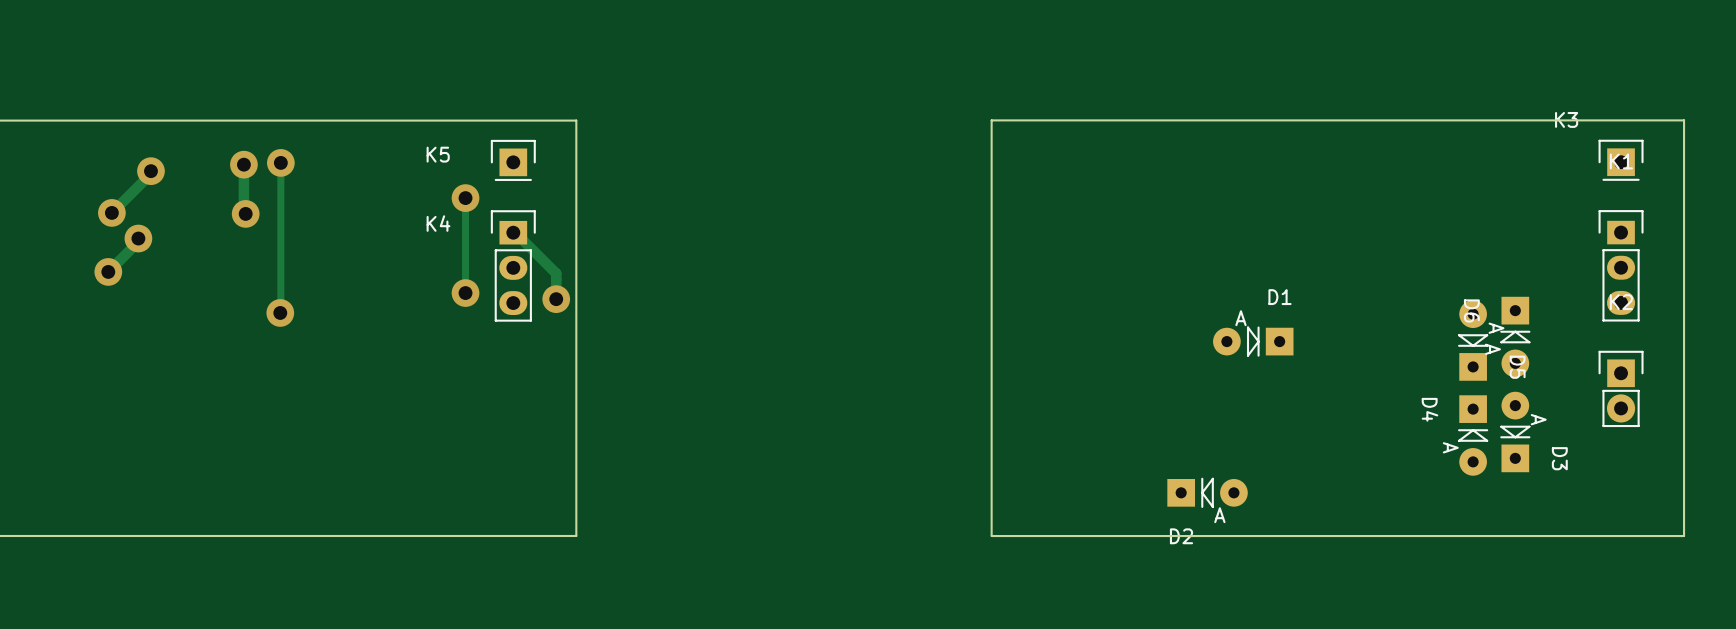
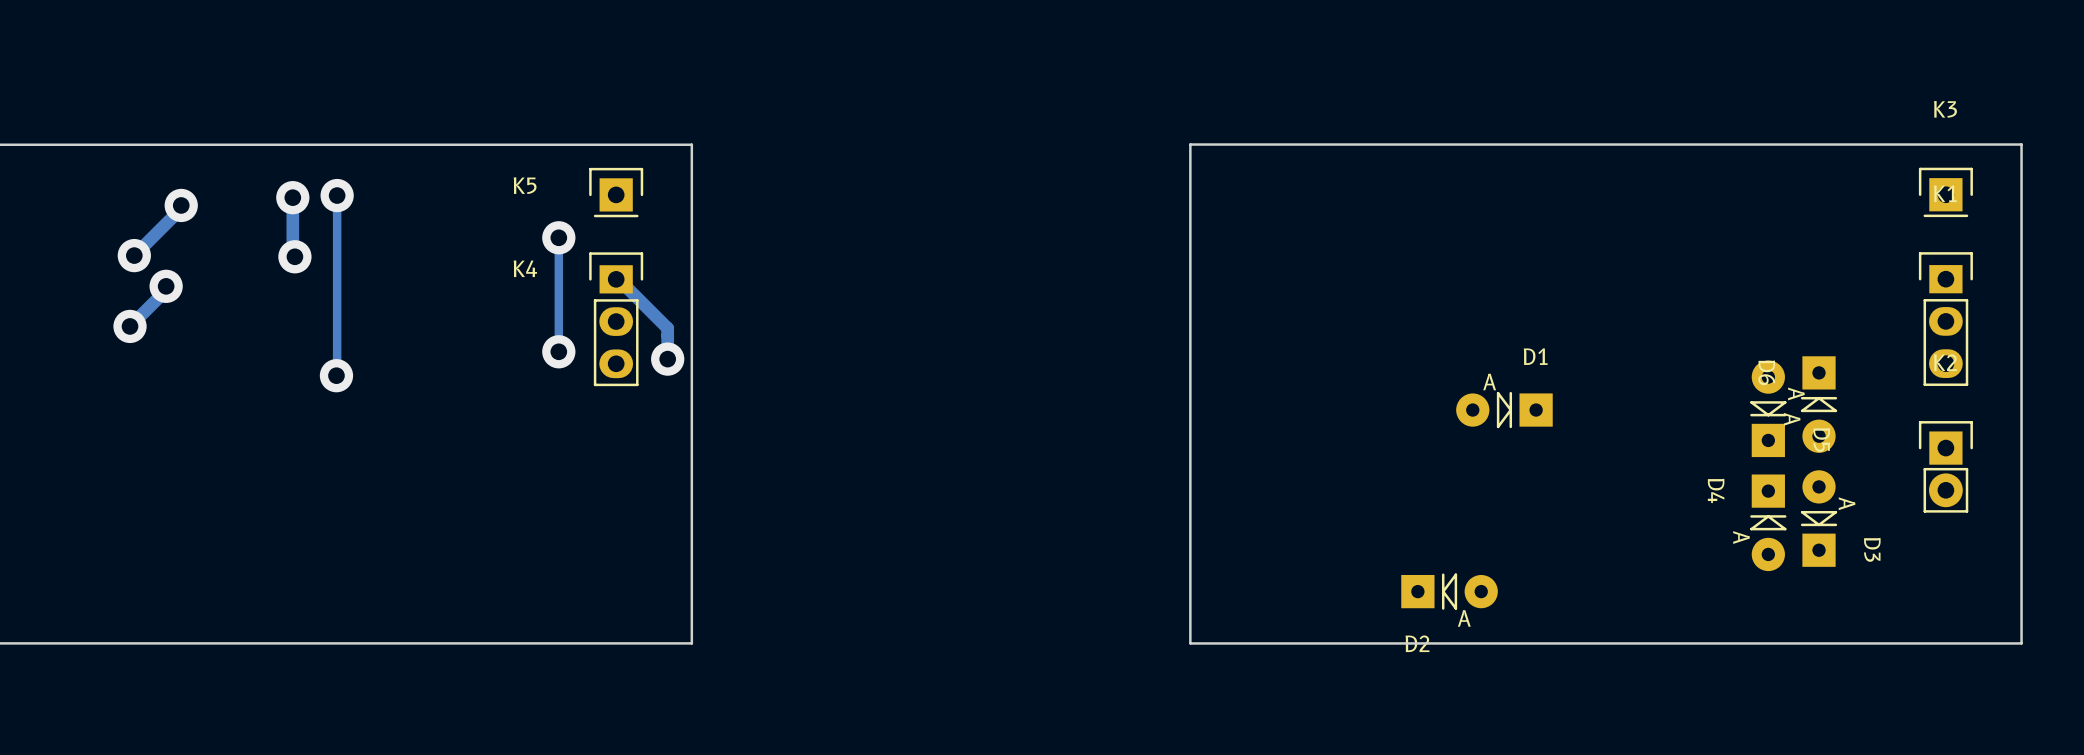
K3 name position: K3 (1566, 119) -> K3 (1945, 109)

